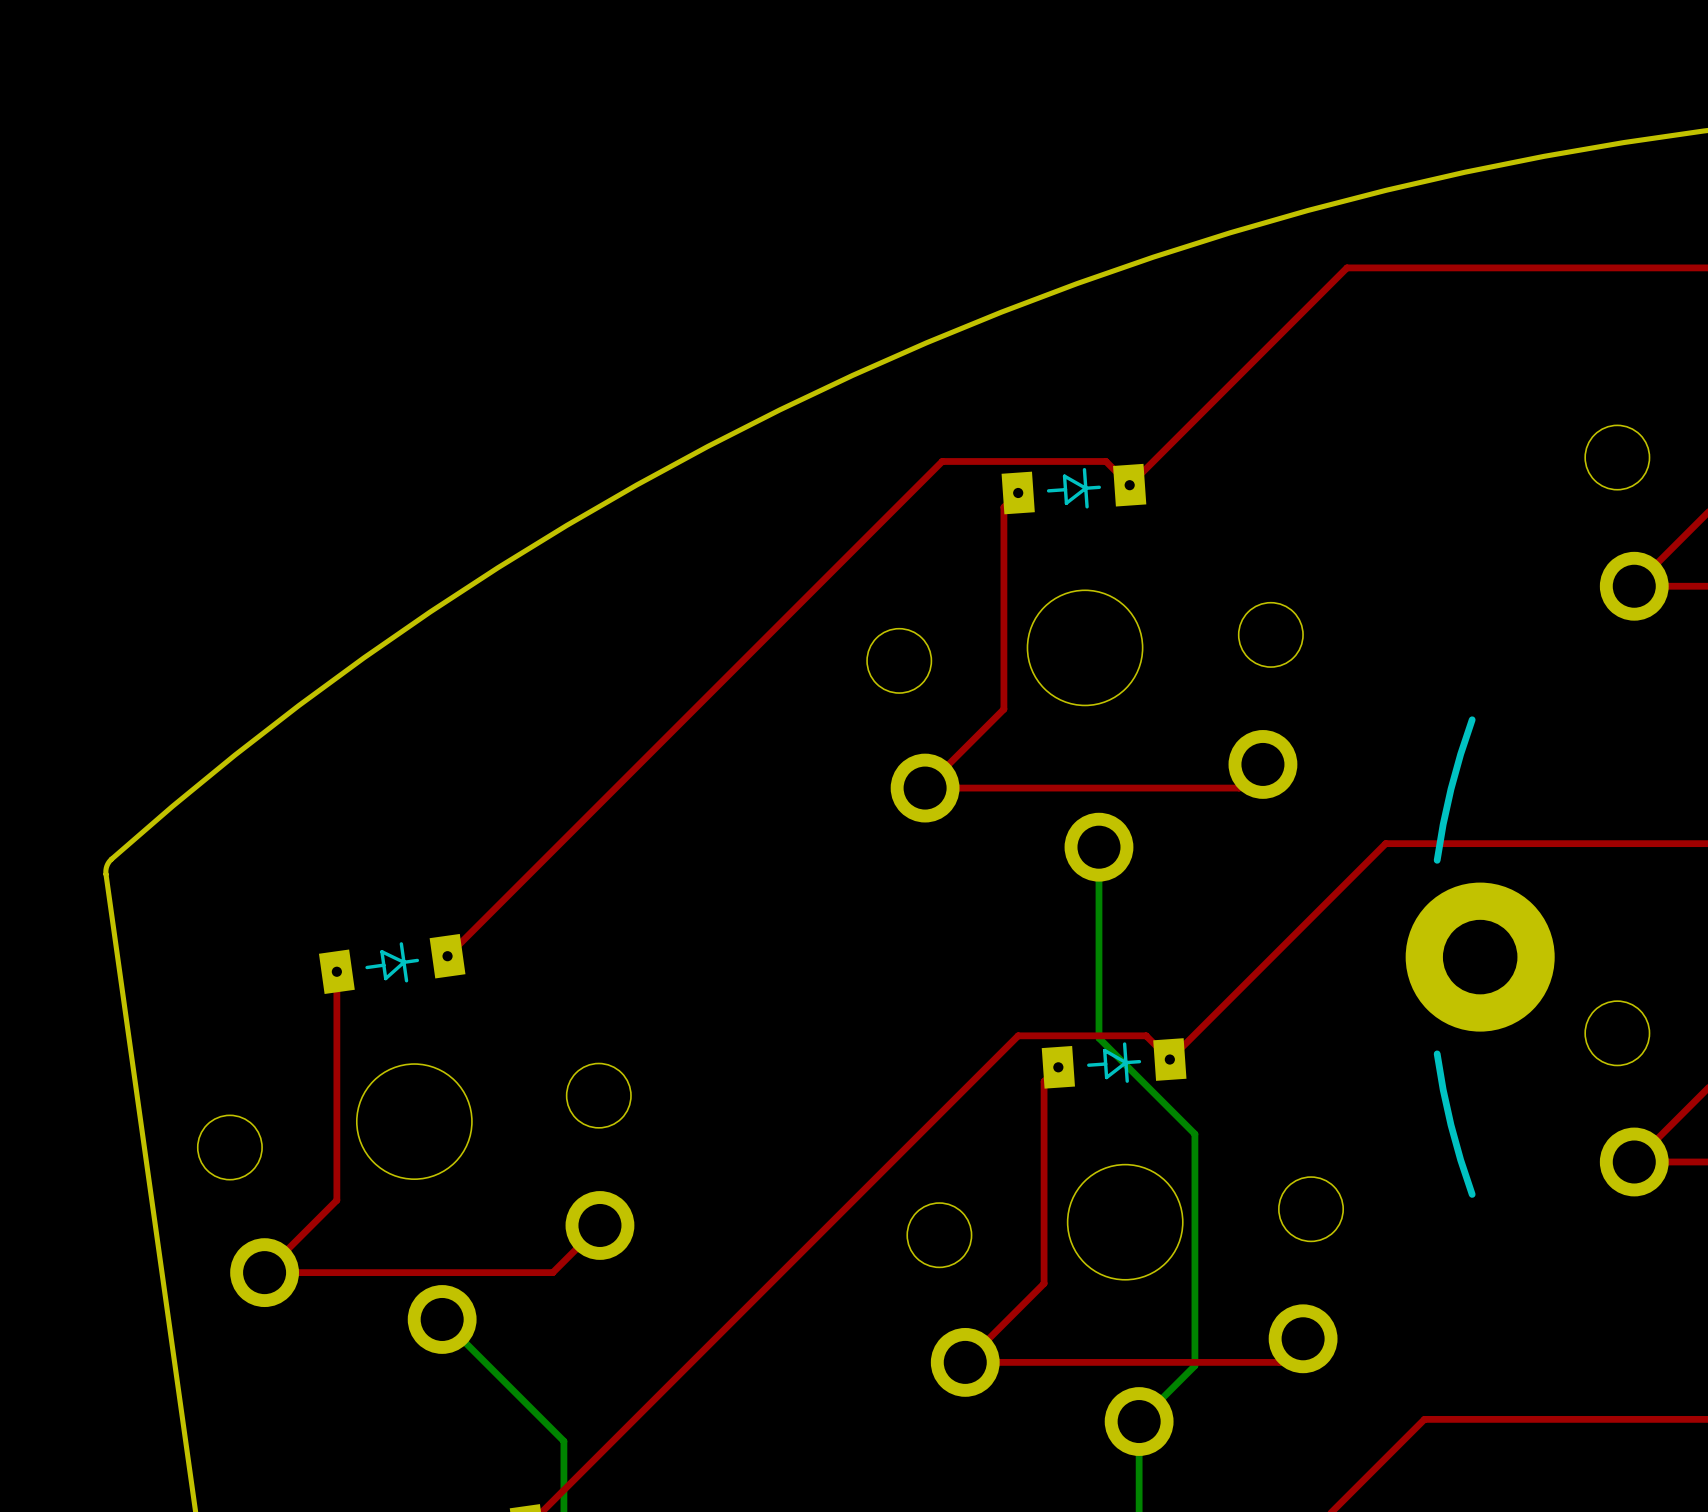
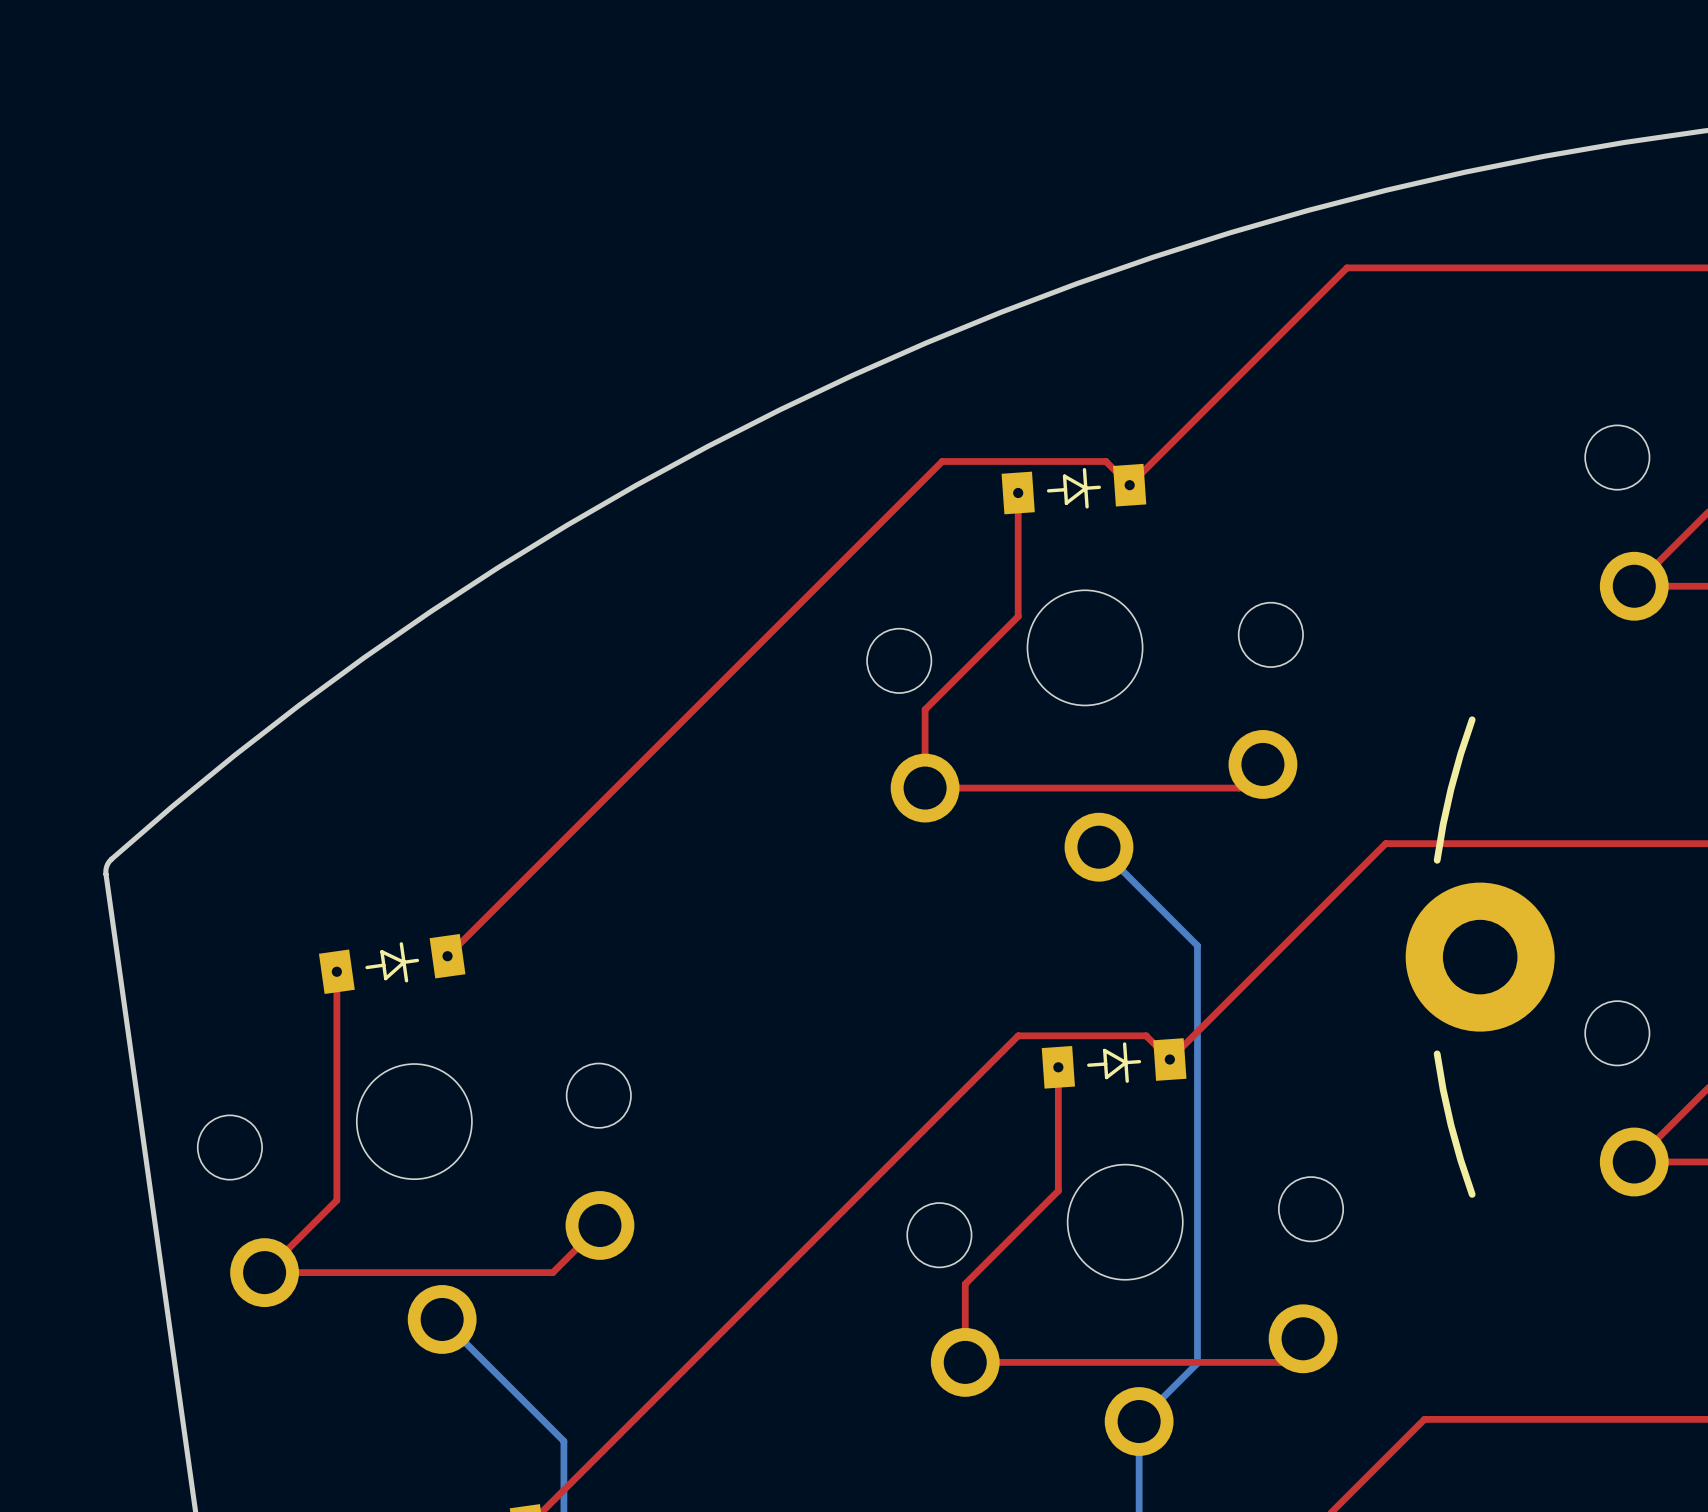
top track: (1018, 492) (1003, 507) (1003, 709) (925, 788) -> (1018, 492) (1018, 616) (925, 709) (925, 788)
bottom track: (1098, 847) (1098, 1038) (1194, 1134) (1194, 1365) -> (1098, 847) (1197, 945) (1197, 1363) (1194, 1365)
top track: (1058, 1067) (1044, 1081) (1044, 1283) (965, 1362) -> (1058, 1067) (1058, 1190) (965, 1283) (965, 1362)

